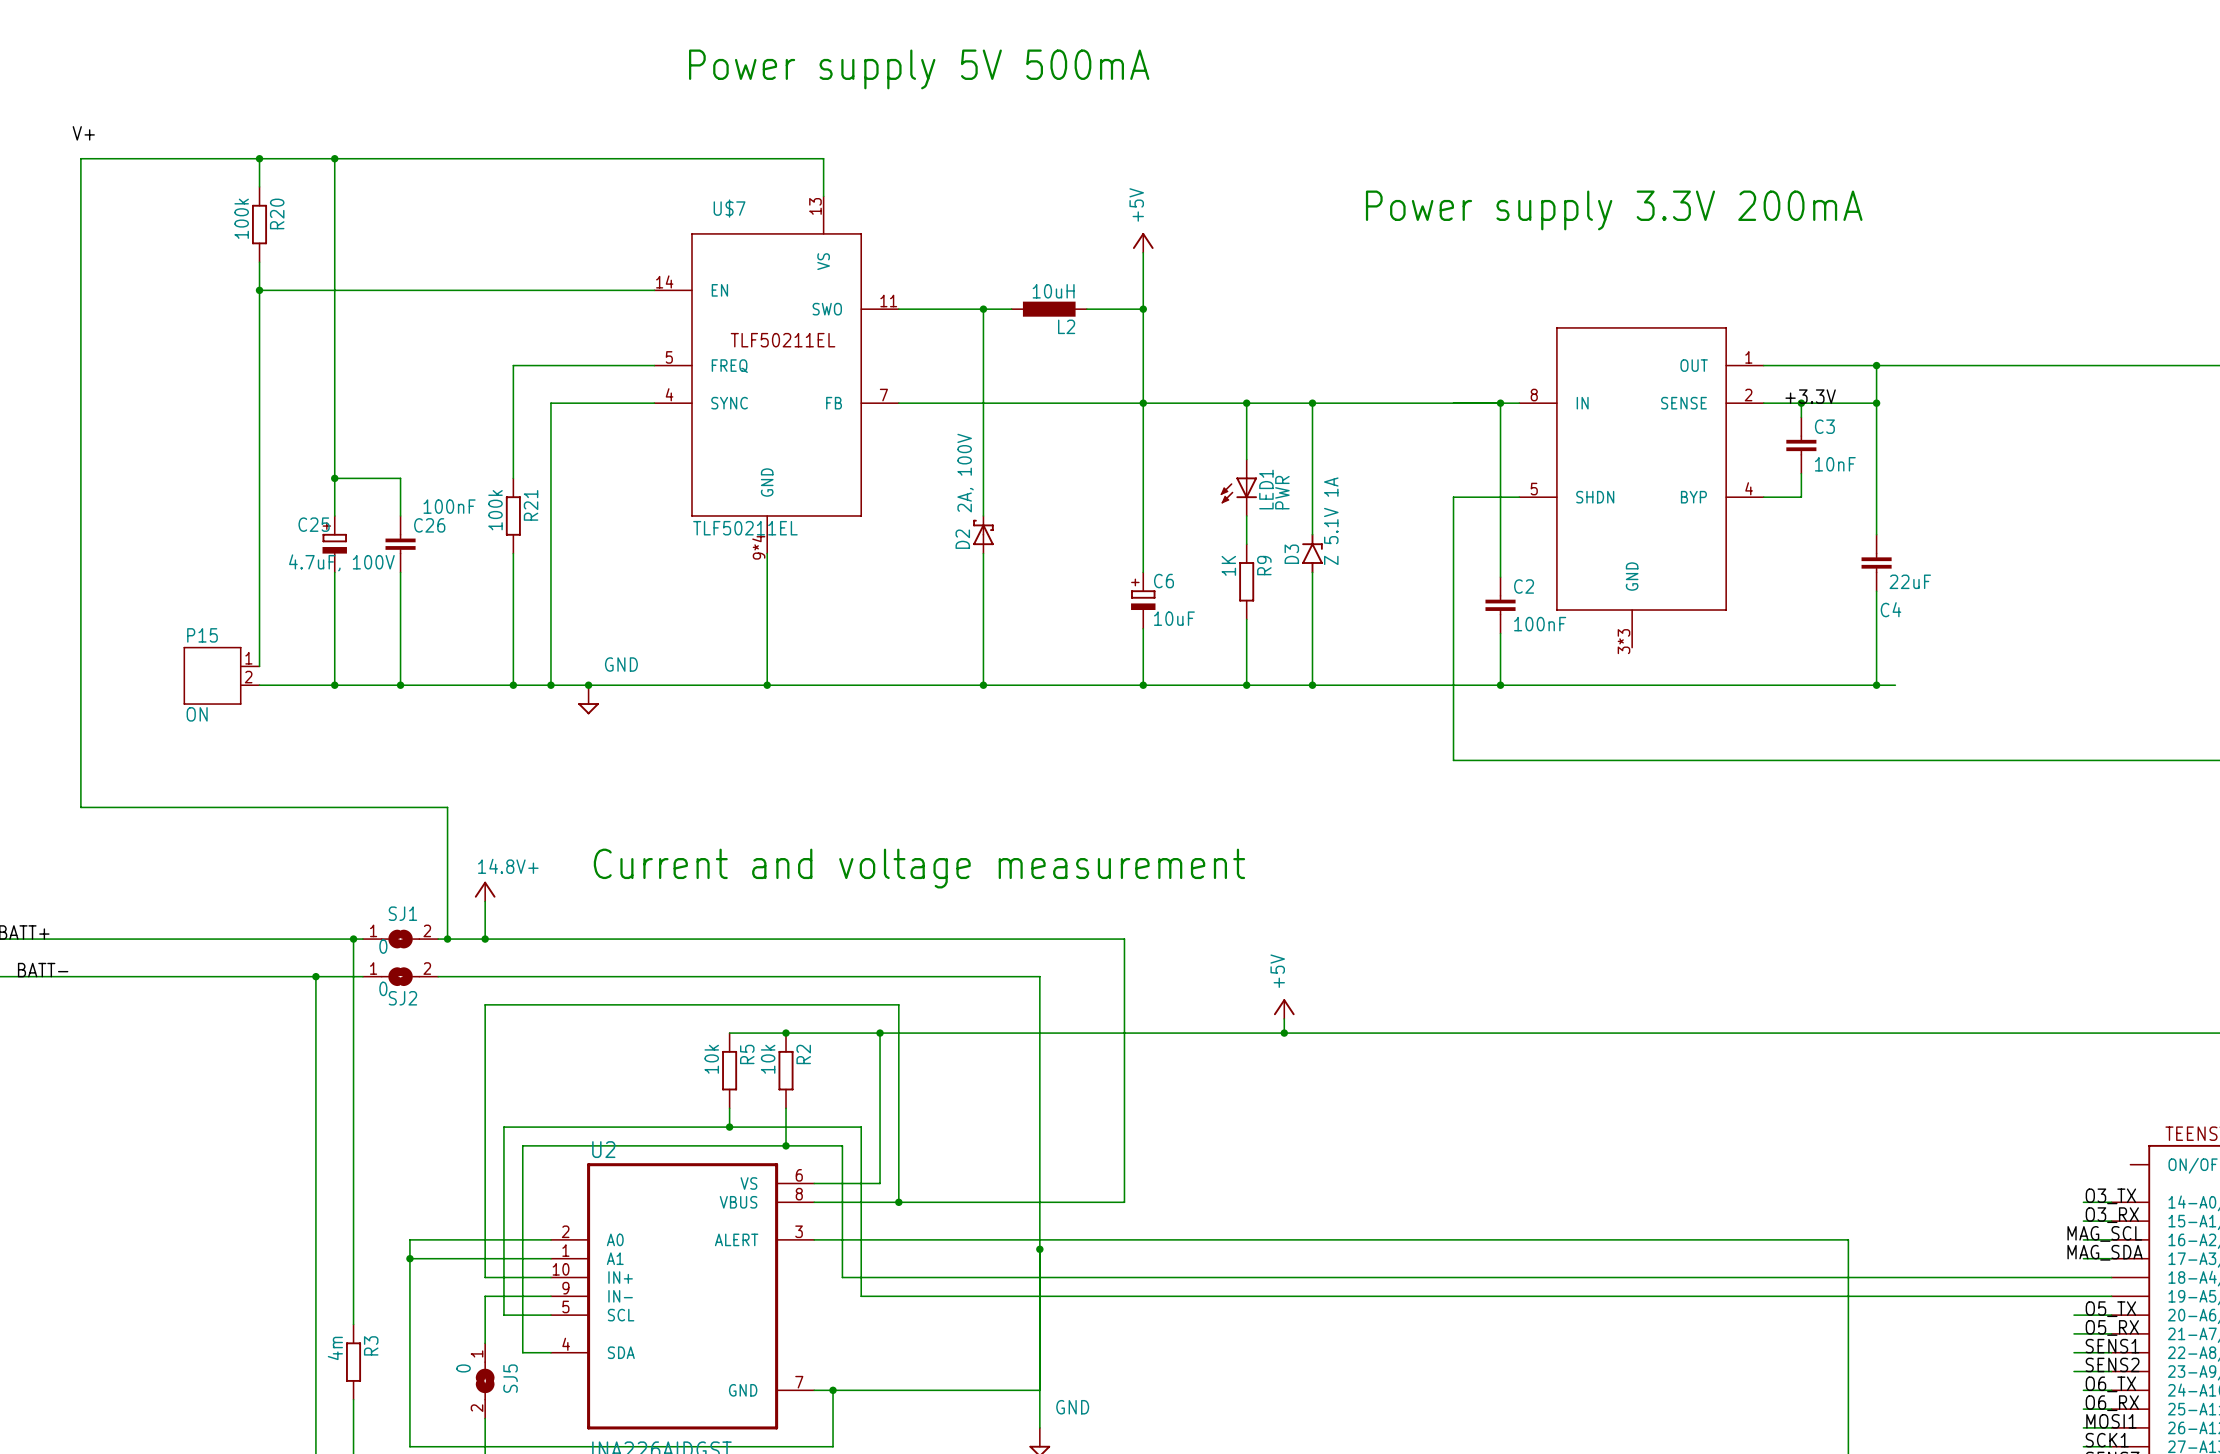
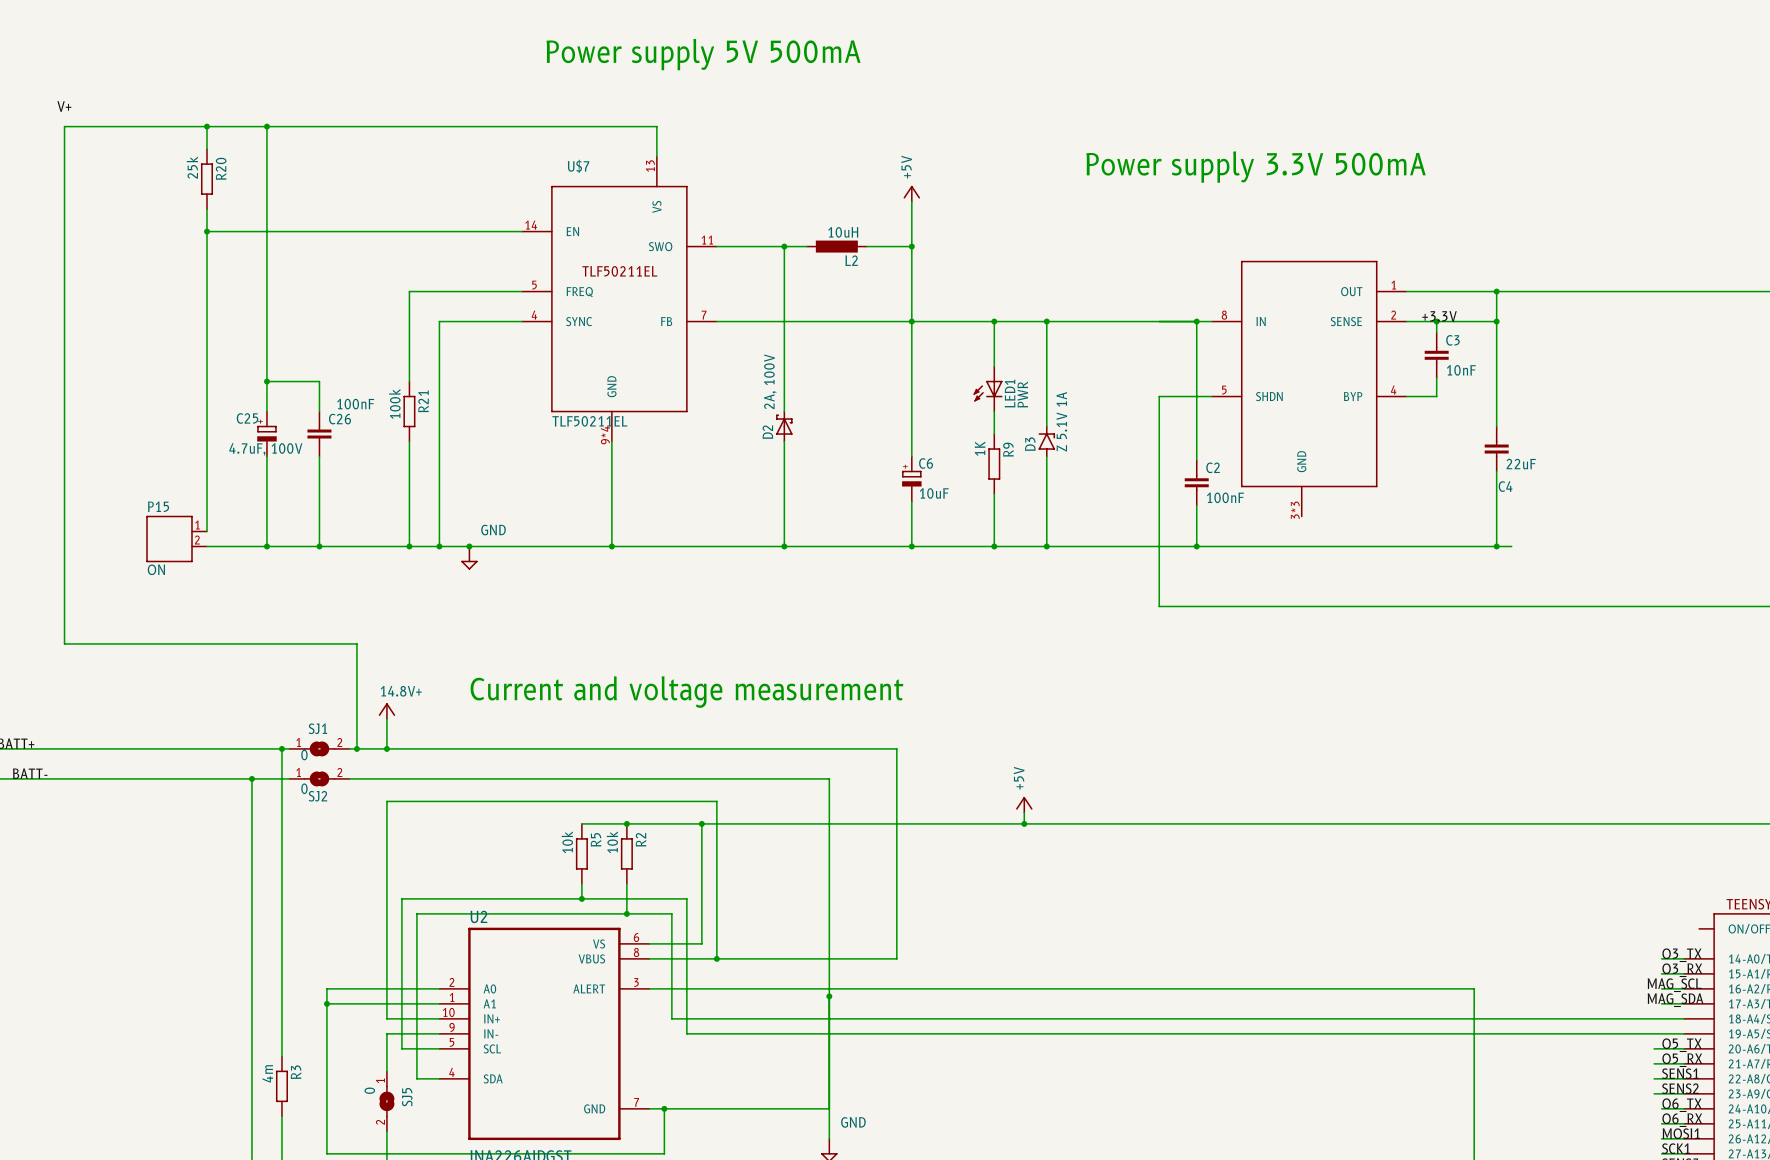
text: Power supply 3.3V 200mA (1614, 210) -> Power supply 3.3V 500mA (1256, 167)
R20 value: 100k (241, 218) -> 25k (192, 167)

